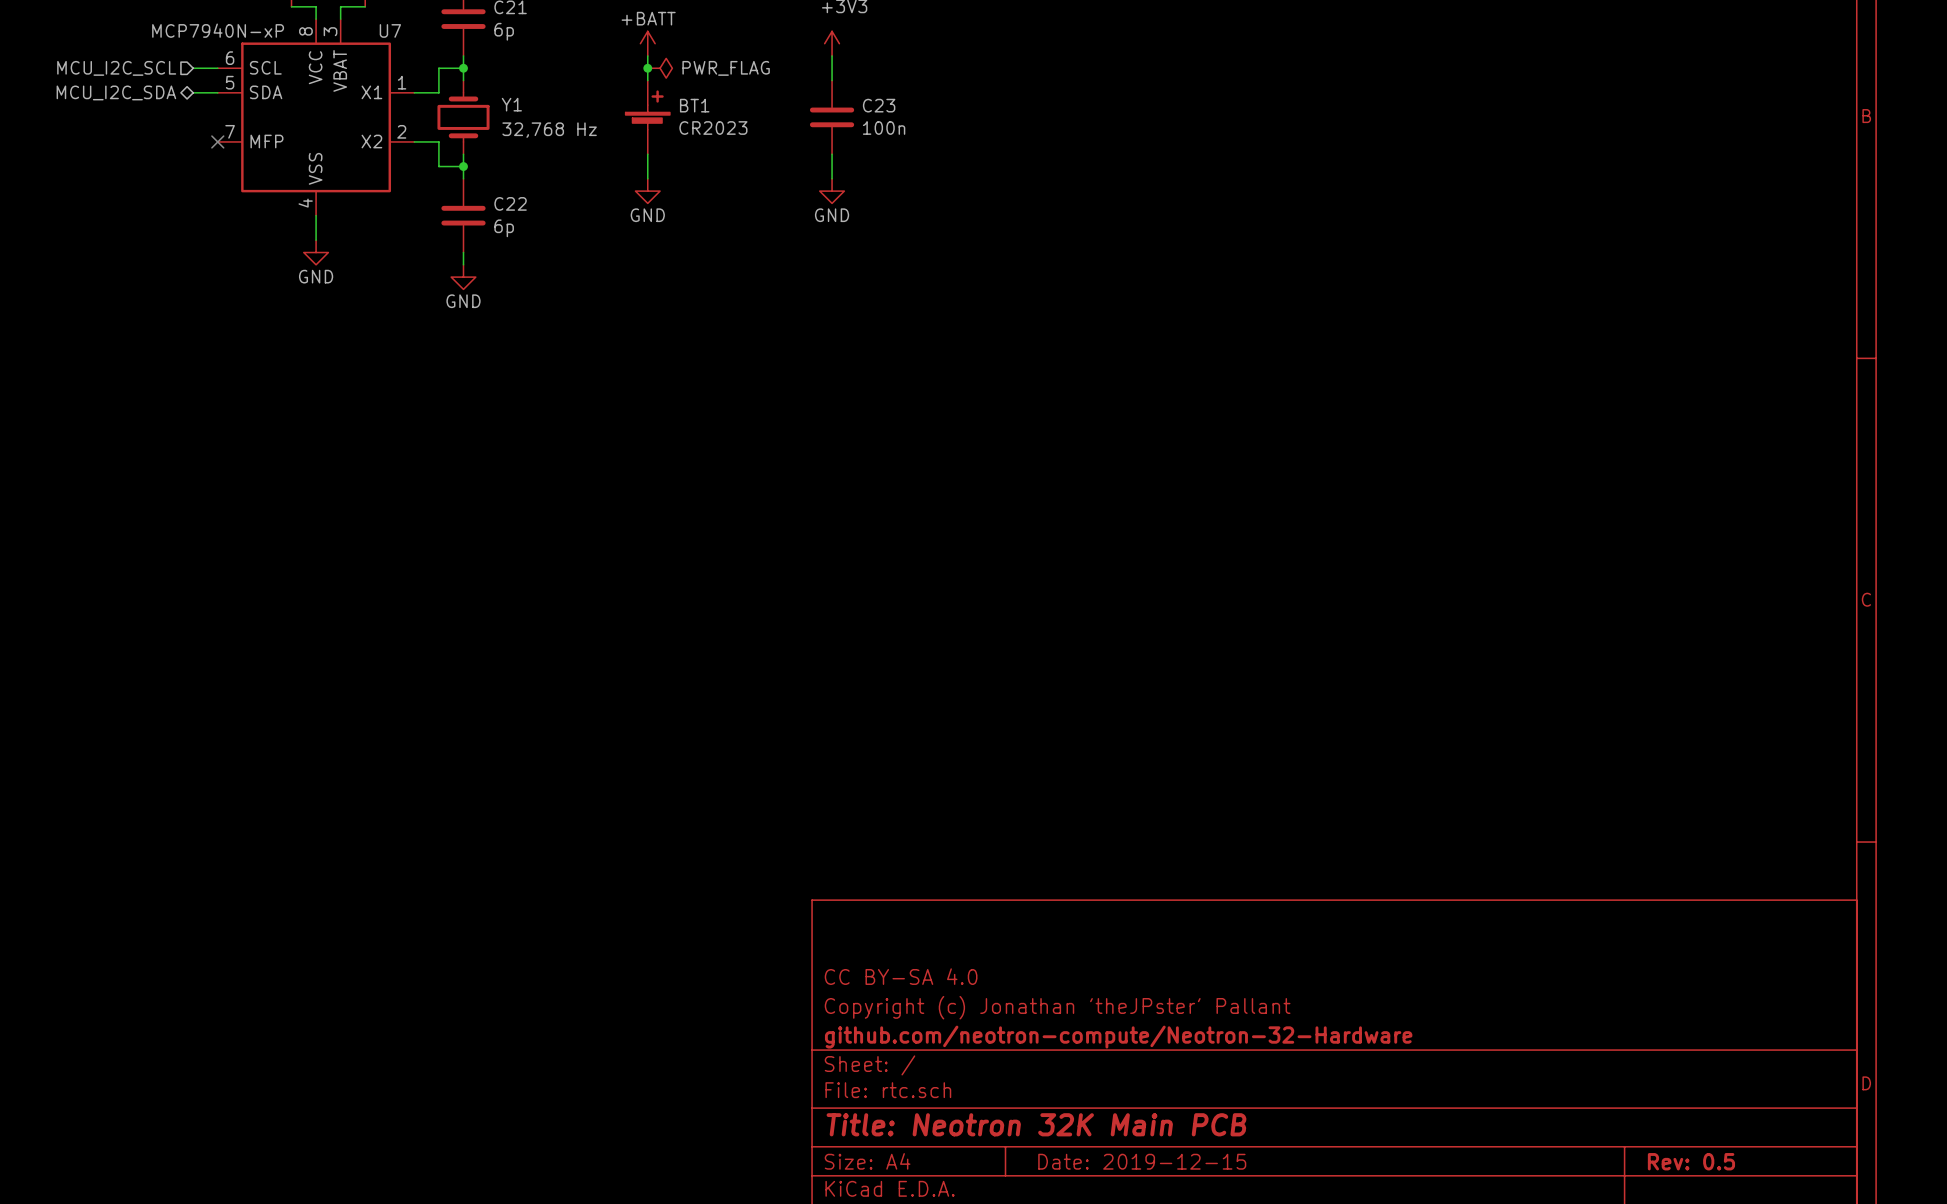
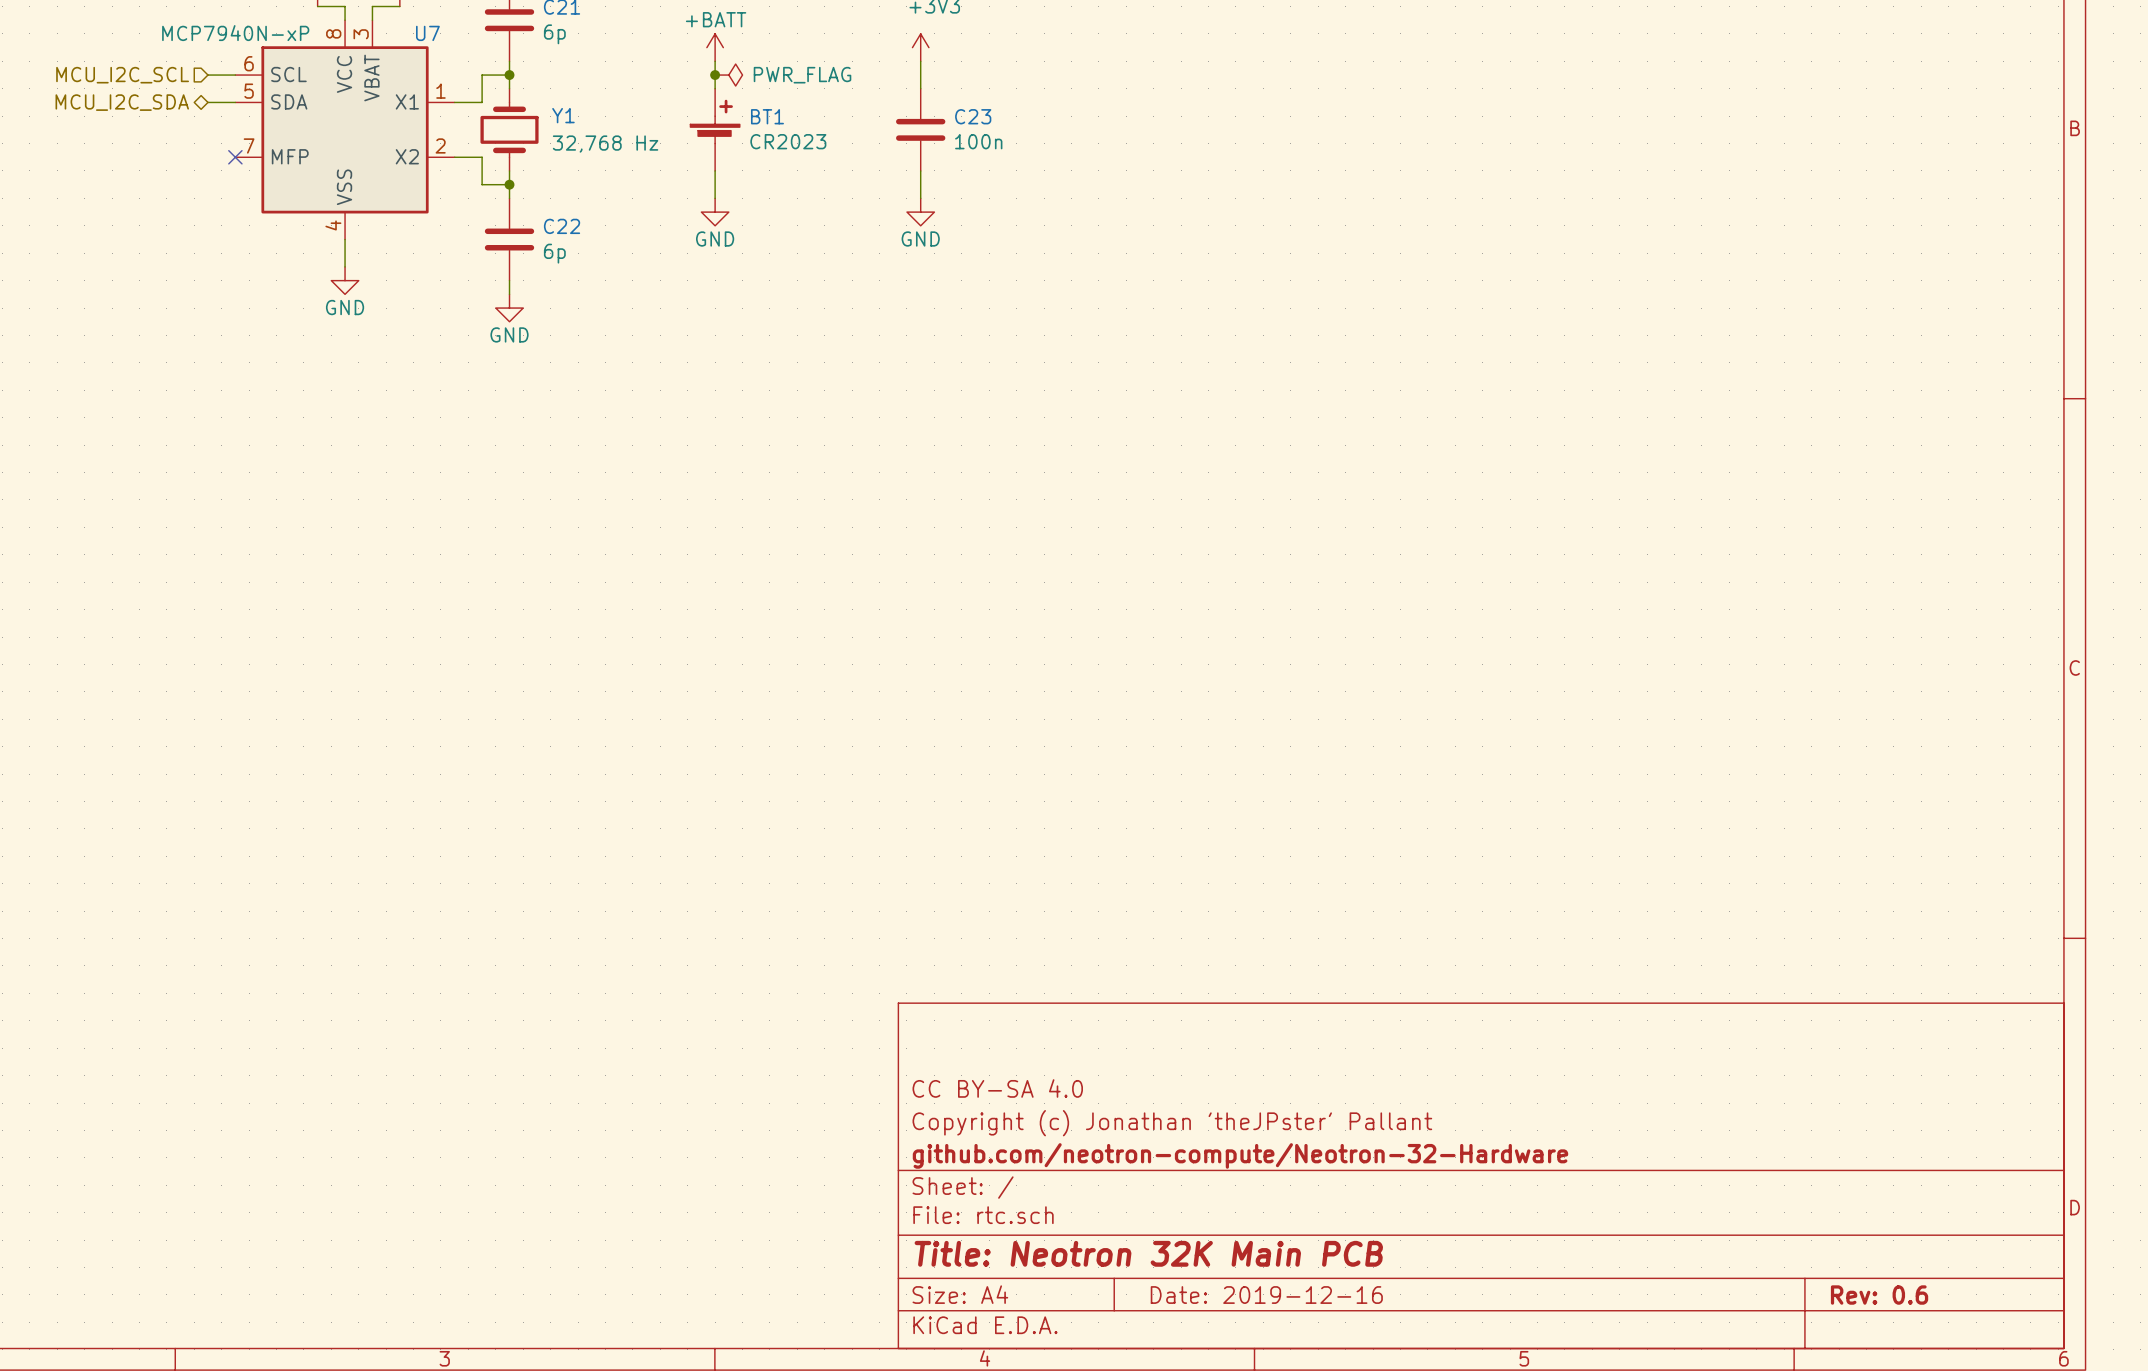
title block: Date: 2019-12-15 (1142, 1161) -> Date: 2019-12-16 (1266, 1295)
title block: Rev: 0.5 (1691, 1161) -> Rev: 0.6 (1879, 1295)

